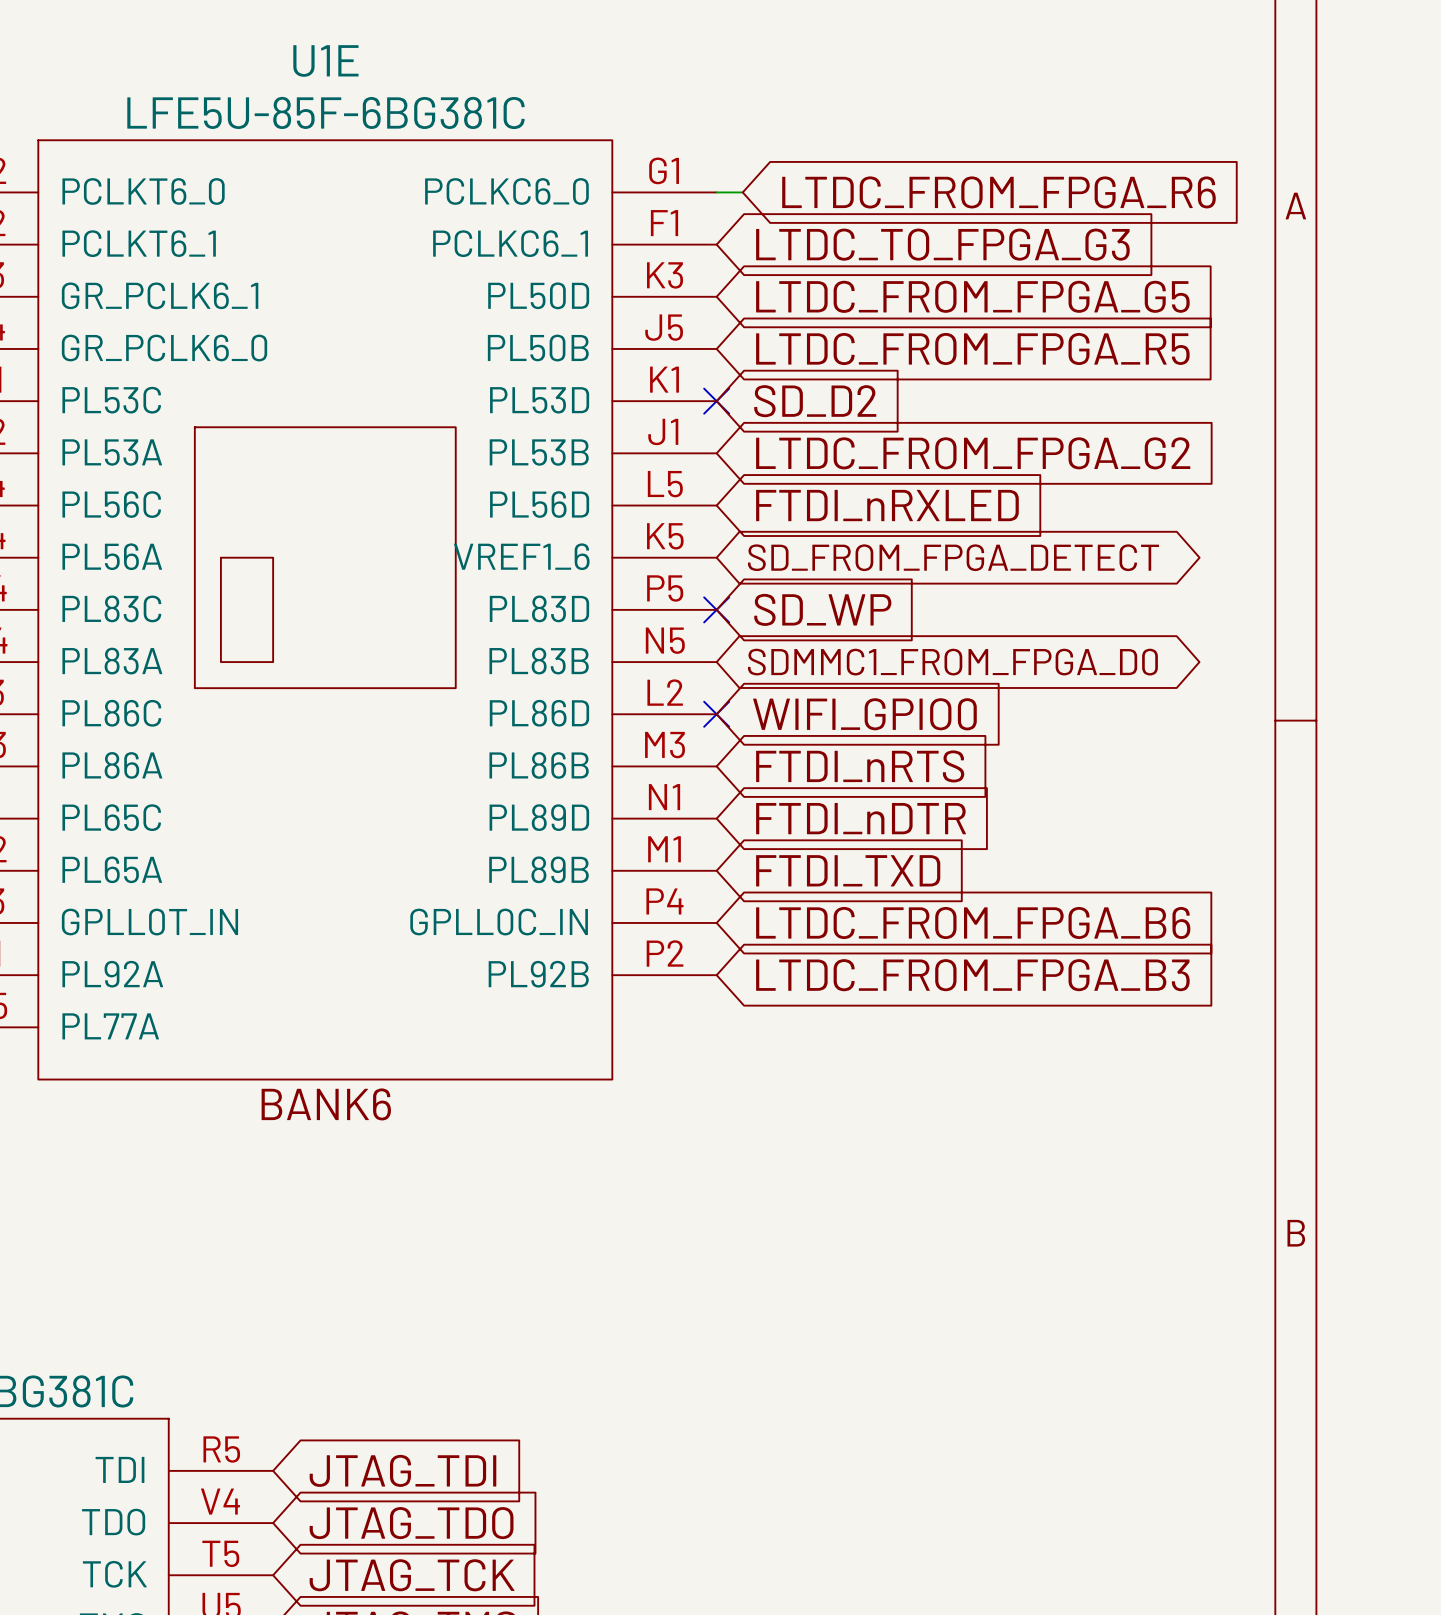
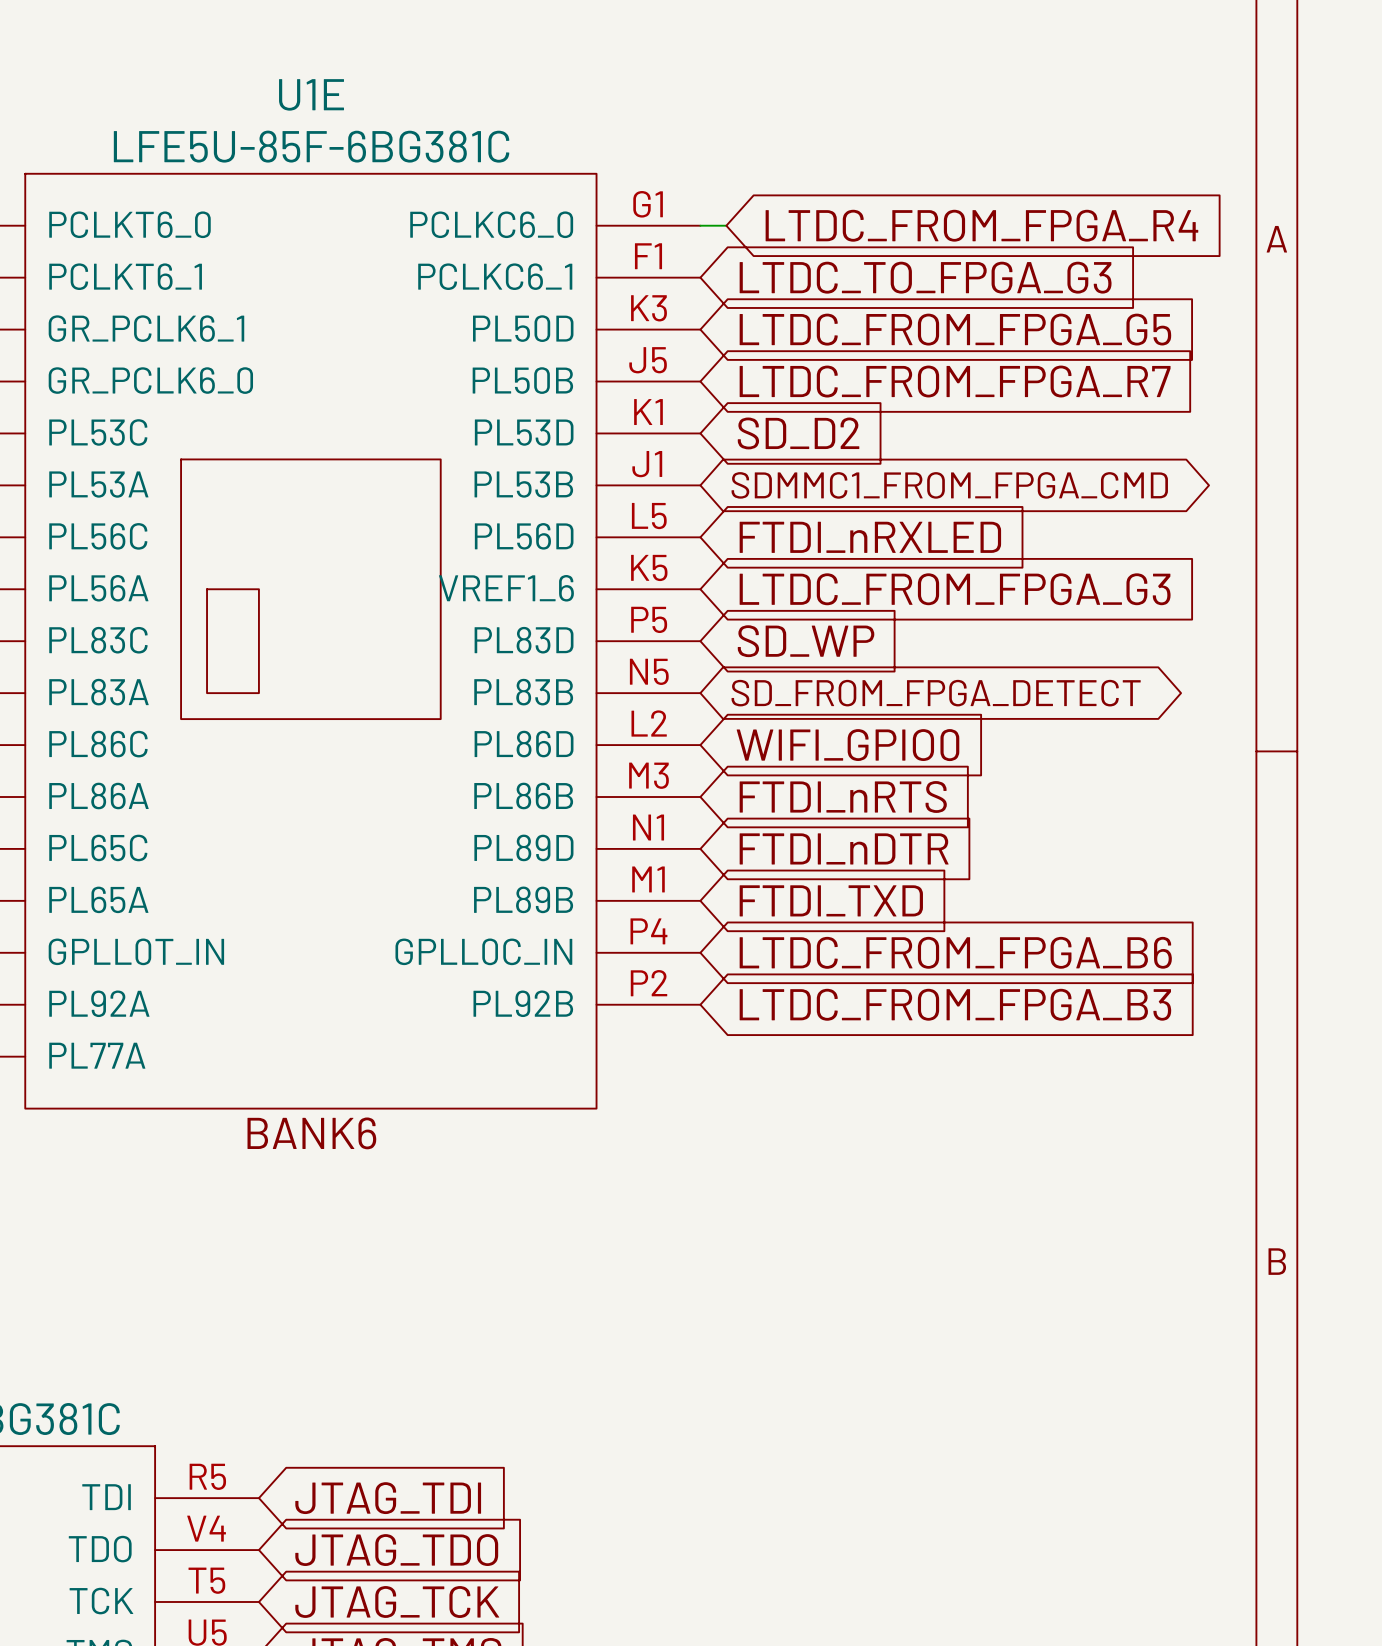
global label: LTDC_FROM_FPGA_R6 (998, 192) -> LTDC_FROM_FPGA_R4 (981, 225)
global label: LTDC_FROM_FPGA_R5 (972, 349) -> LTDC_FROM_FPGA_R7 (955, 381)
no-connect mark: (716, 401) -> none
global label shape: input (973, 453) -> bidirectional (949, 485)
global label: LTDC_FROM_FPGA_G2 (973, 453) -> SDMMC1_FROM_FPGA_CMD (949, 485)
global label shape: bidirectional (953, 557) -> input (955, 589)
global label: SD_FROM_FPGA_DETECT (953, 557) -> LTDC_FROM_FPGA_G3 (955, 589)
no-connect mark: (716, 609) -> none
global label: SDMMC1_FROM_FPGA_D0 (952, 662) -> SD_FROM_FPGA_DETECT (936, 693)
no-connect mark: (716, 714) -> none

